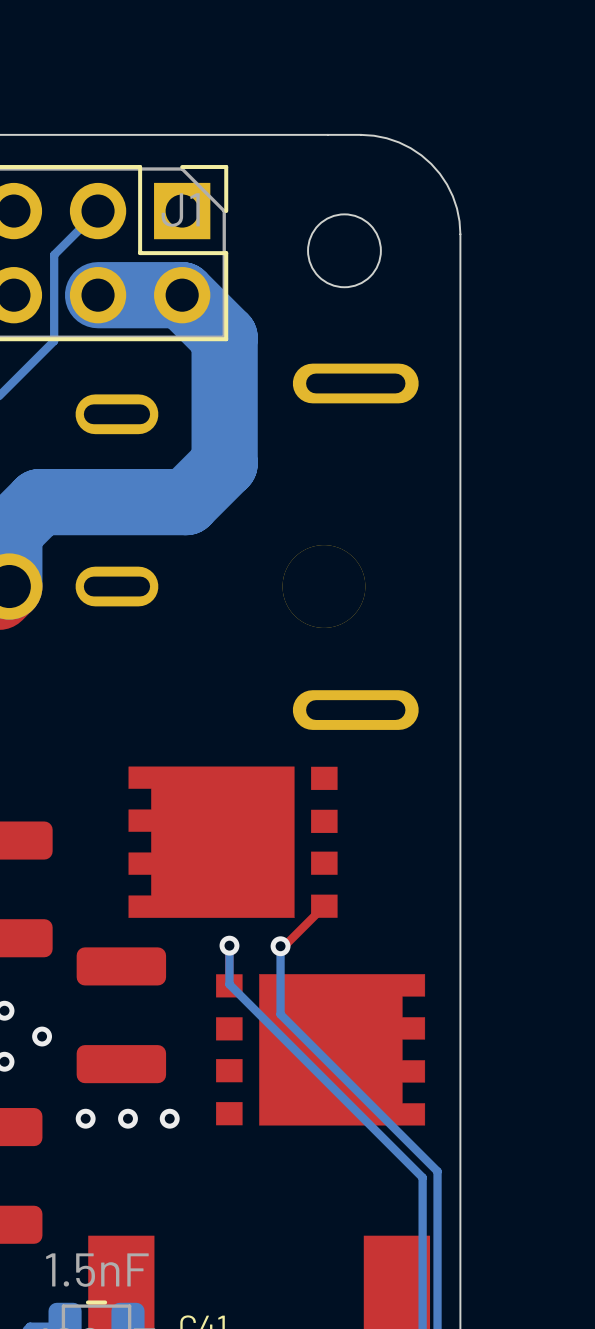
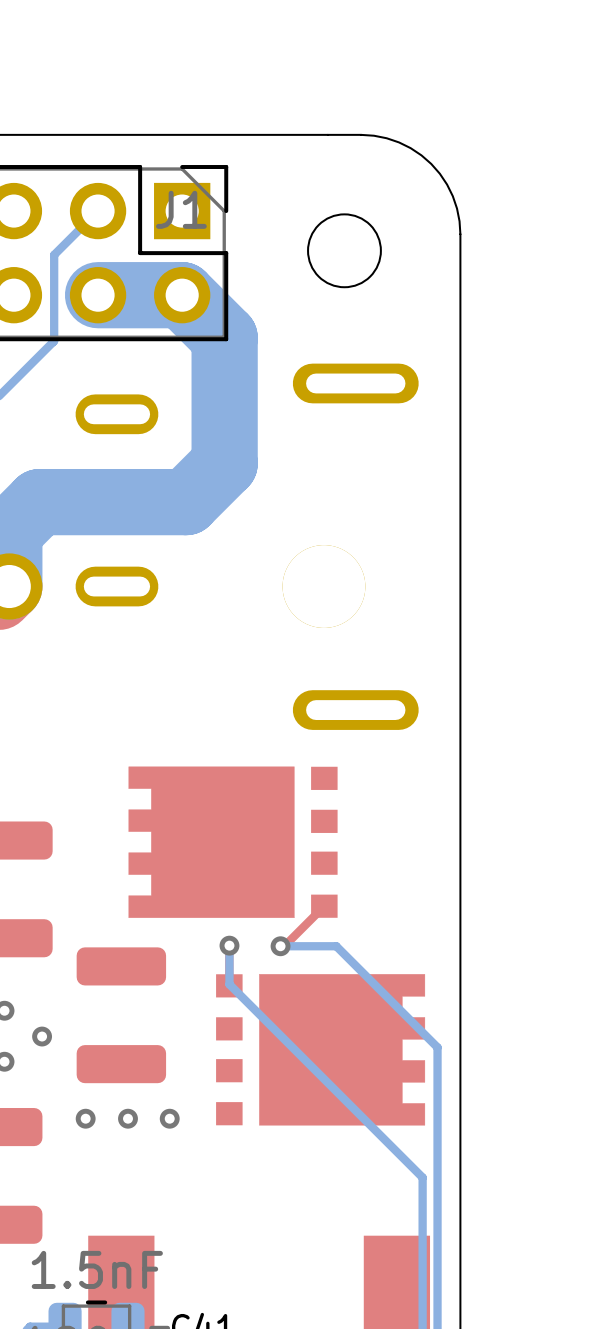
bottom track: (280, 946) (280, 1014) (437, 1171) -> (280, 946) (336, 946) (437, 1047) (437, 1171)

